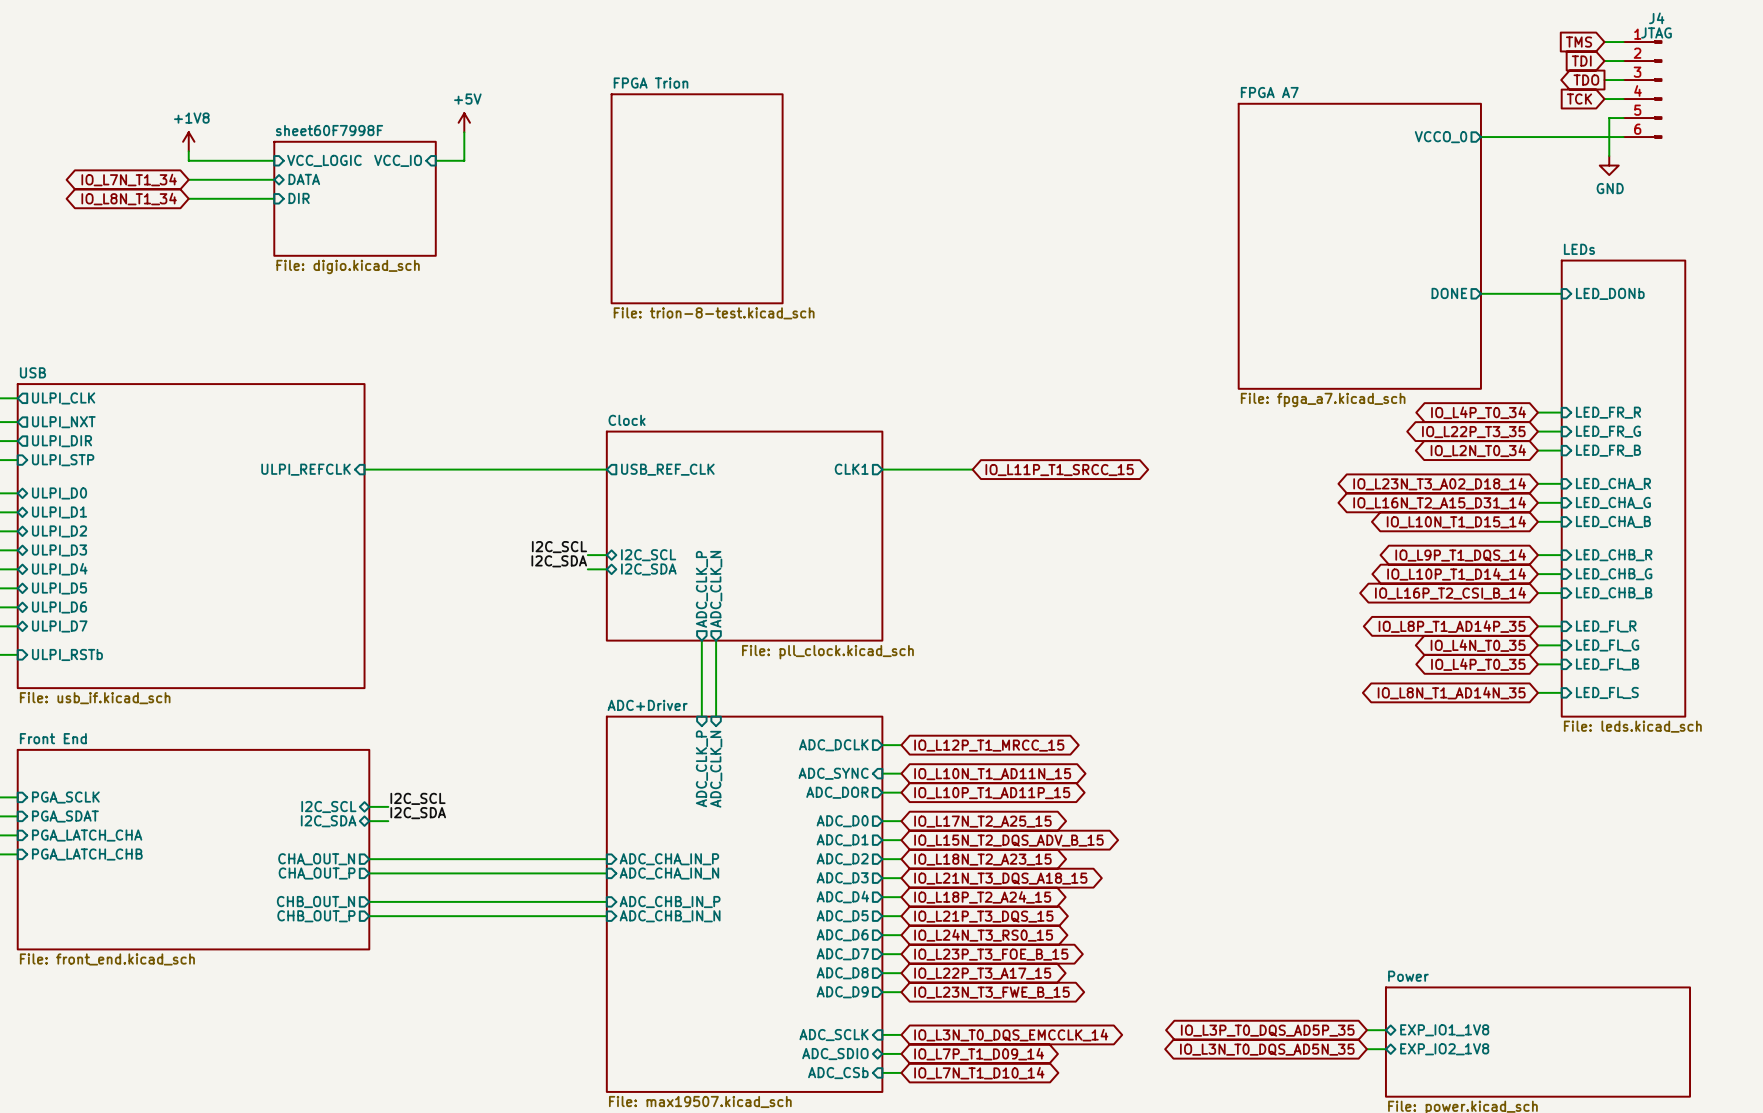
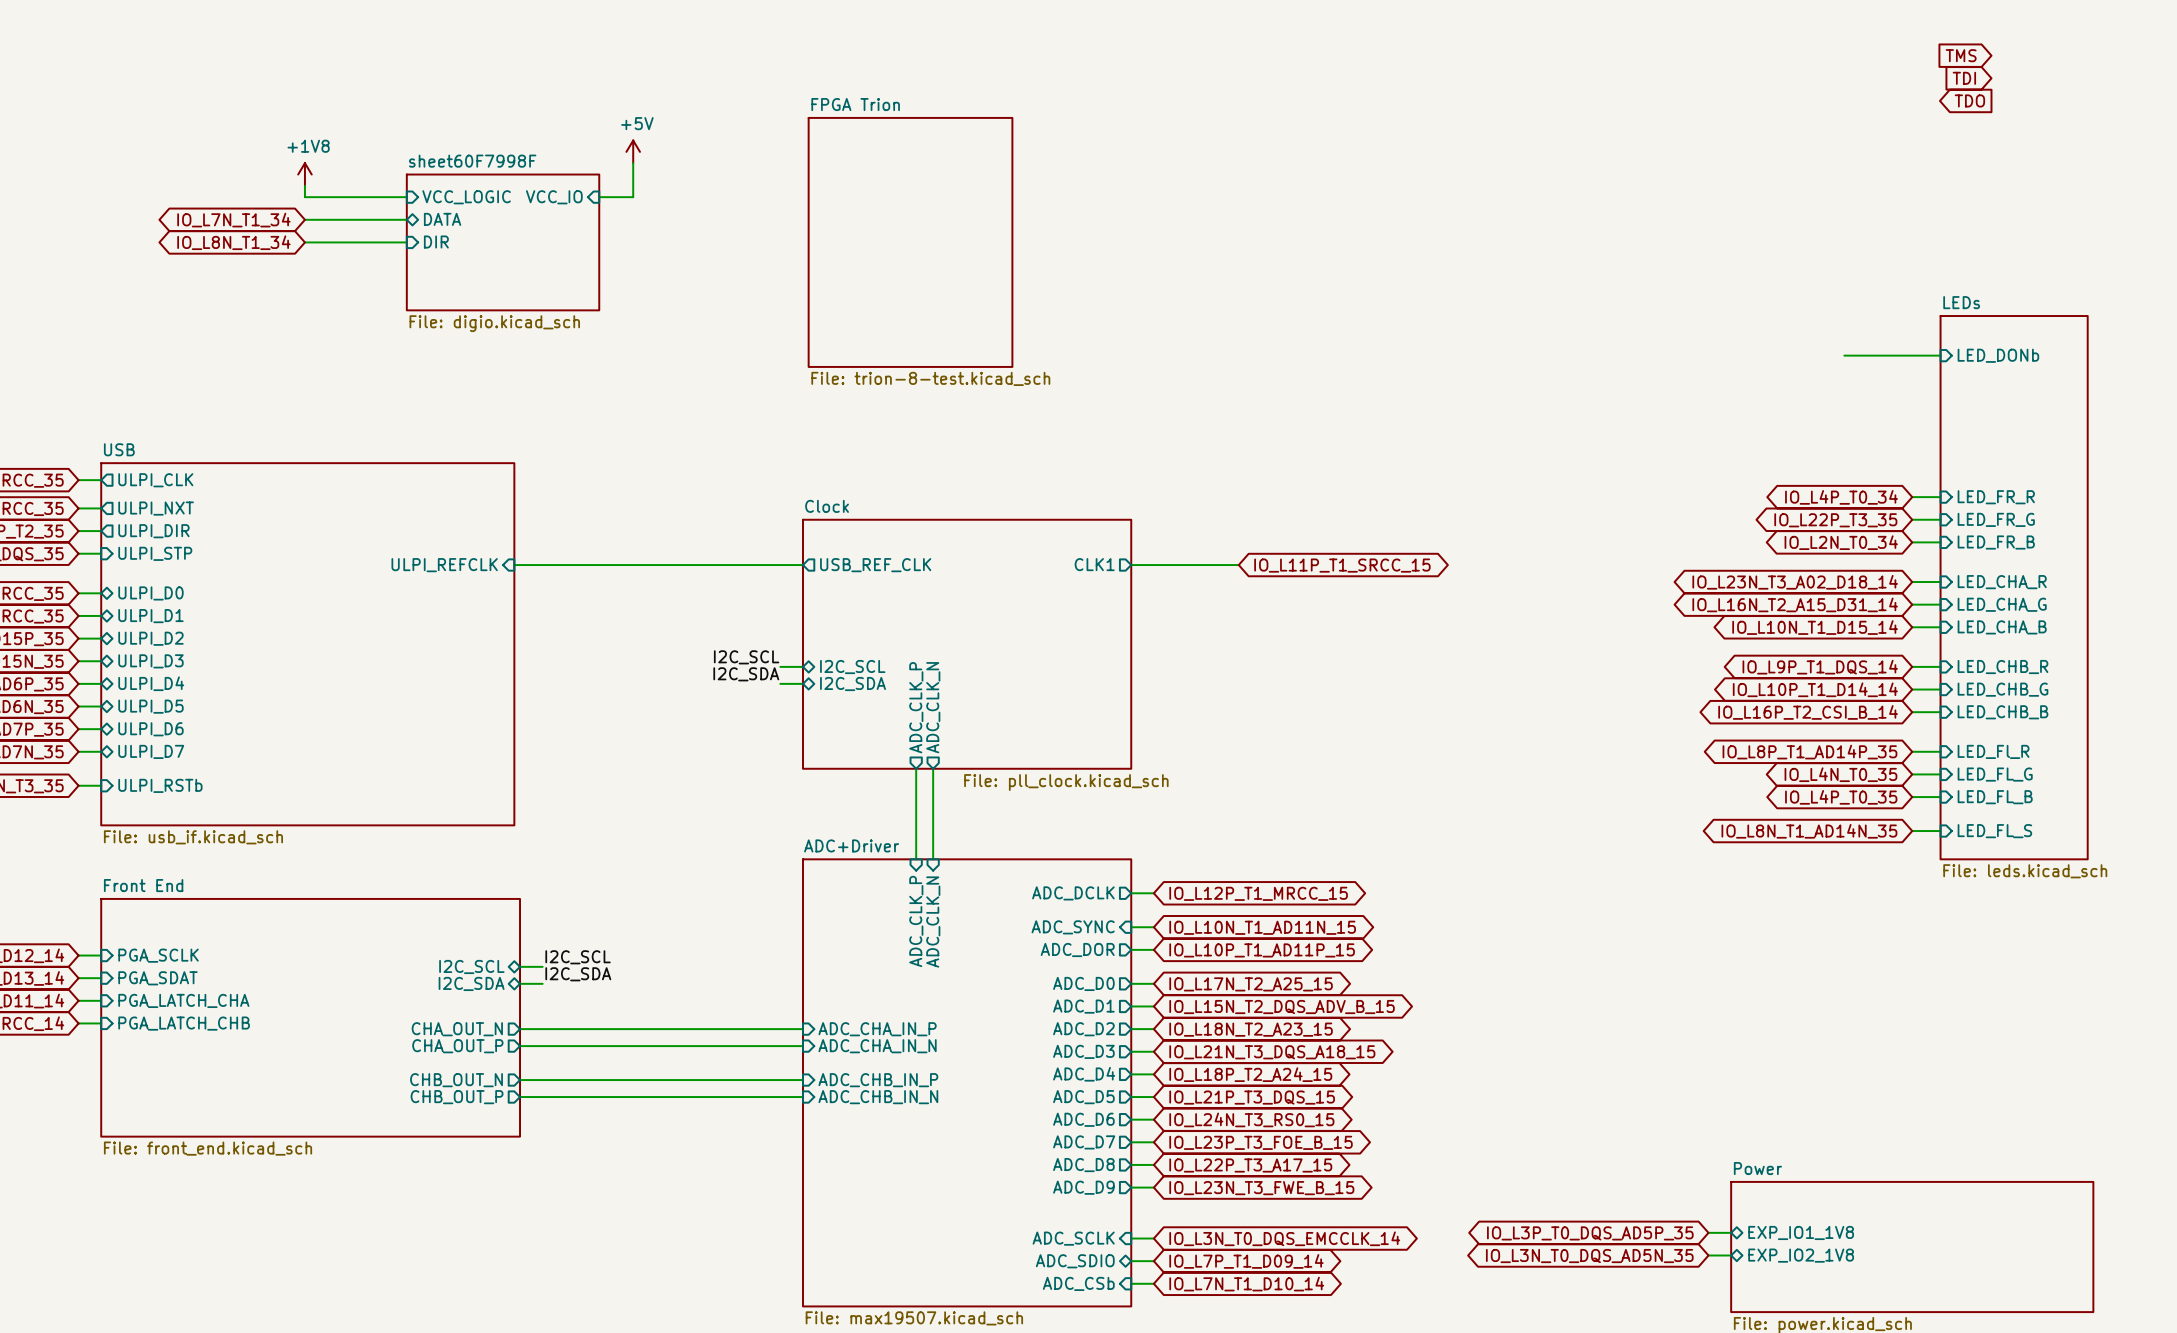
wire: (1604, 42) (1623, 42) -> none
wire: (1604, 61) (1623, 61) -> none
wire: (1604, 80) (1623, 80) -> none
J4: JTAG (1642, 89) -> none
global label: TCK (1579, 99) -> none
wire: (1604, 99) (1623, 99) -> none
wire: (1623, 118) (1609, 118) (1609, 156) -> none
sheet pin: VCCO_0 (1441, 137) -> none
wire: (1480, 137) (1623, 137) -> none
power symbol: GND (1609, 165) -> none
sheet FPGA A7: File: fpga_a7.kicad_sch (1359, 246) -> none
sheet pin: DONE (1449, 293) -> none

